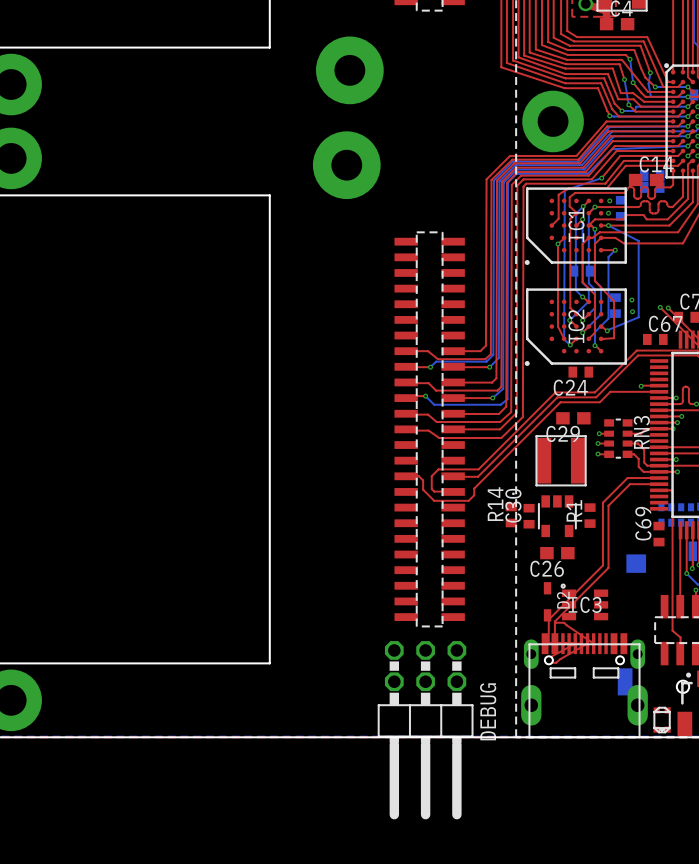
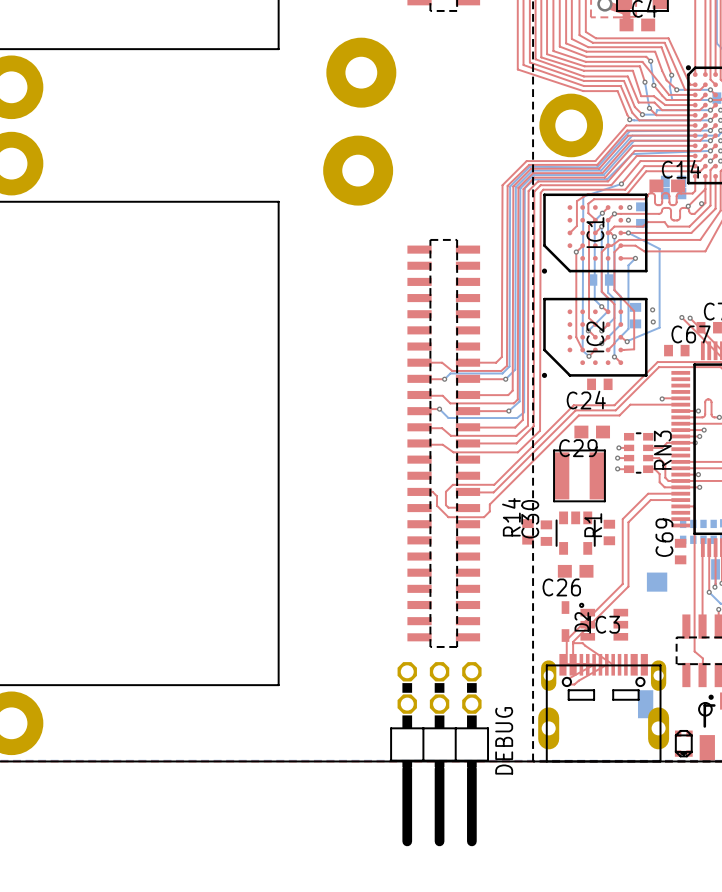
top track: none -> (705, 189) (688, 206)
via: none -> (701, 203)
via: none -> (688, 206)

